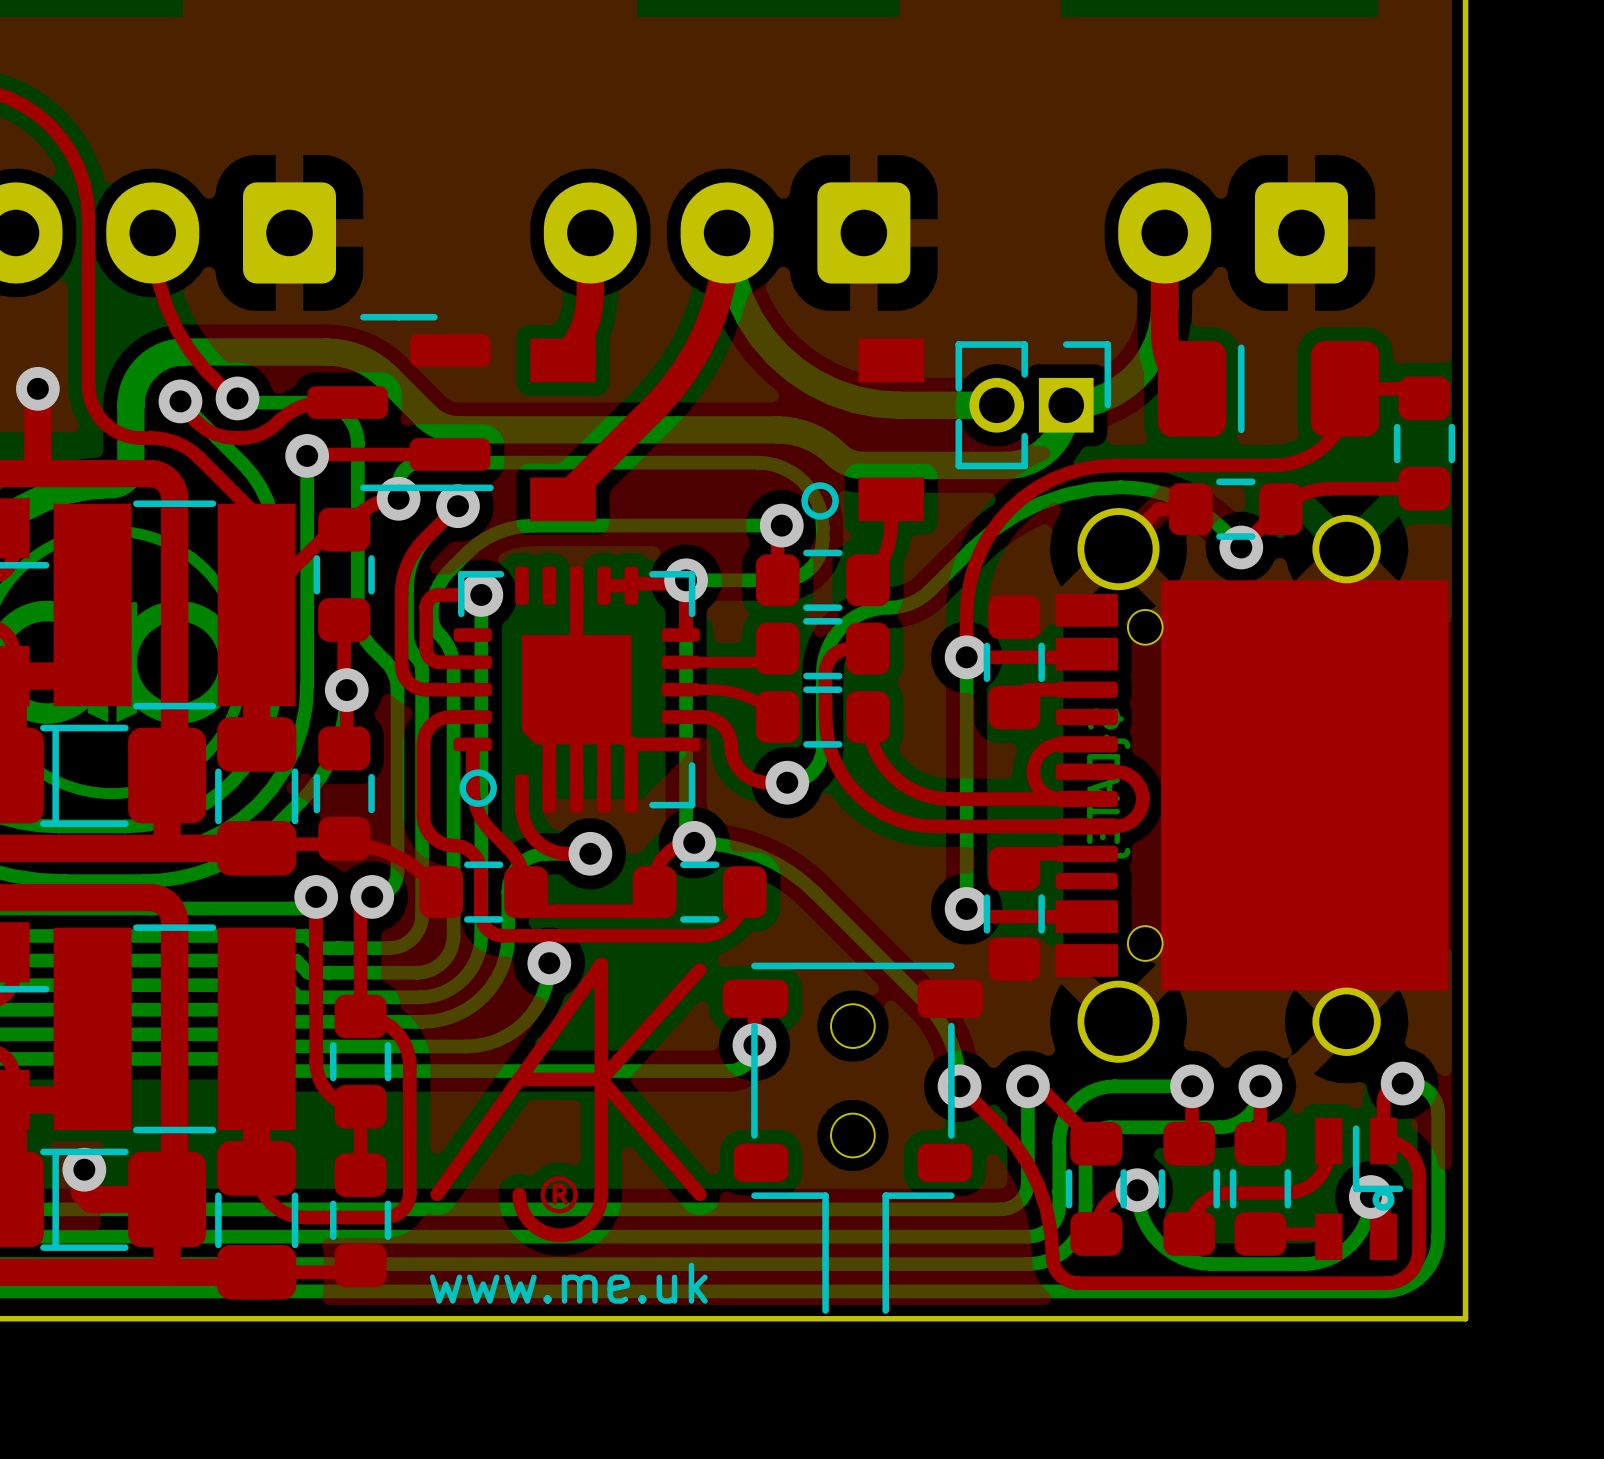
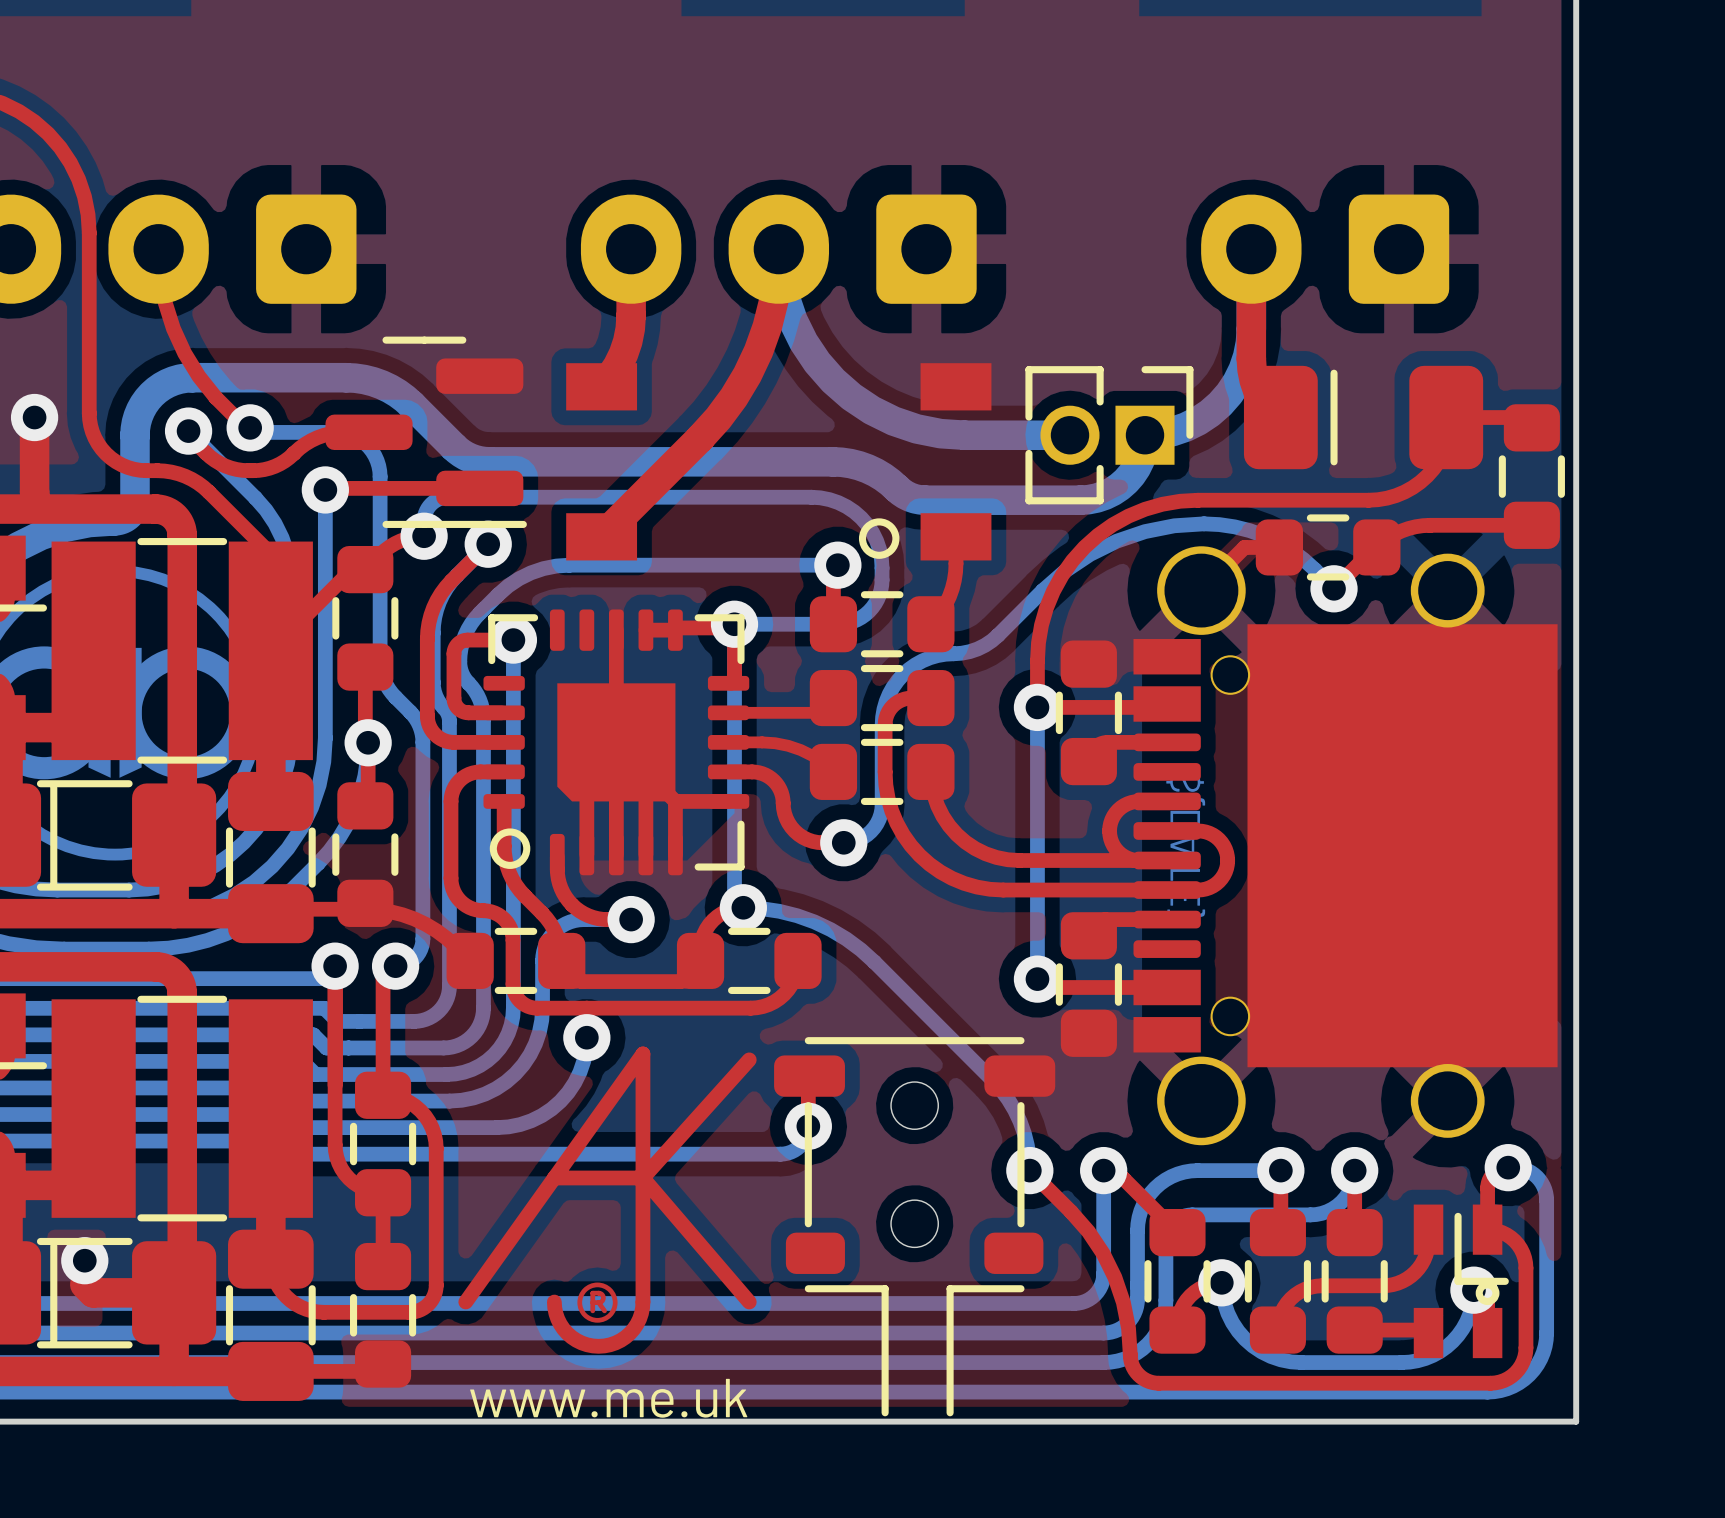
drawing position: (568, 1099) -> (607, 1200)

